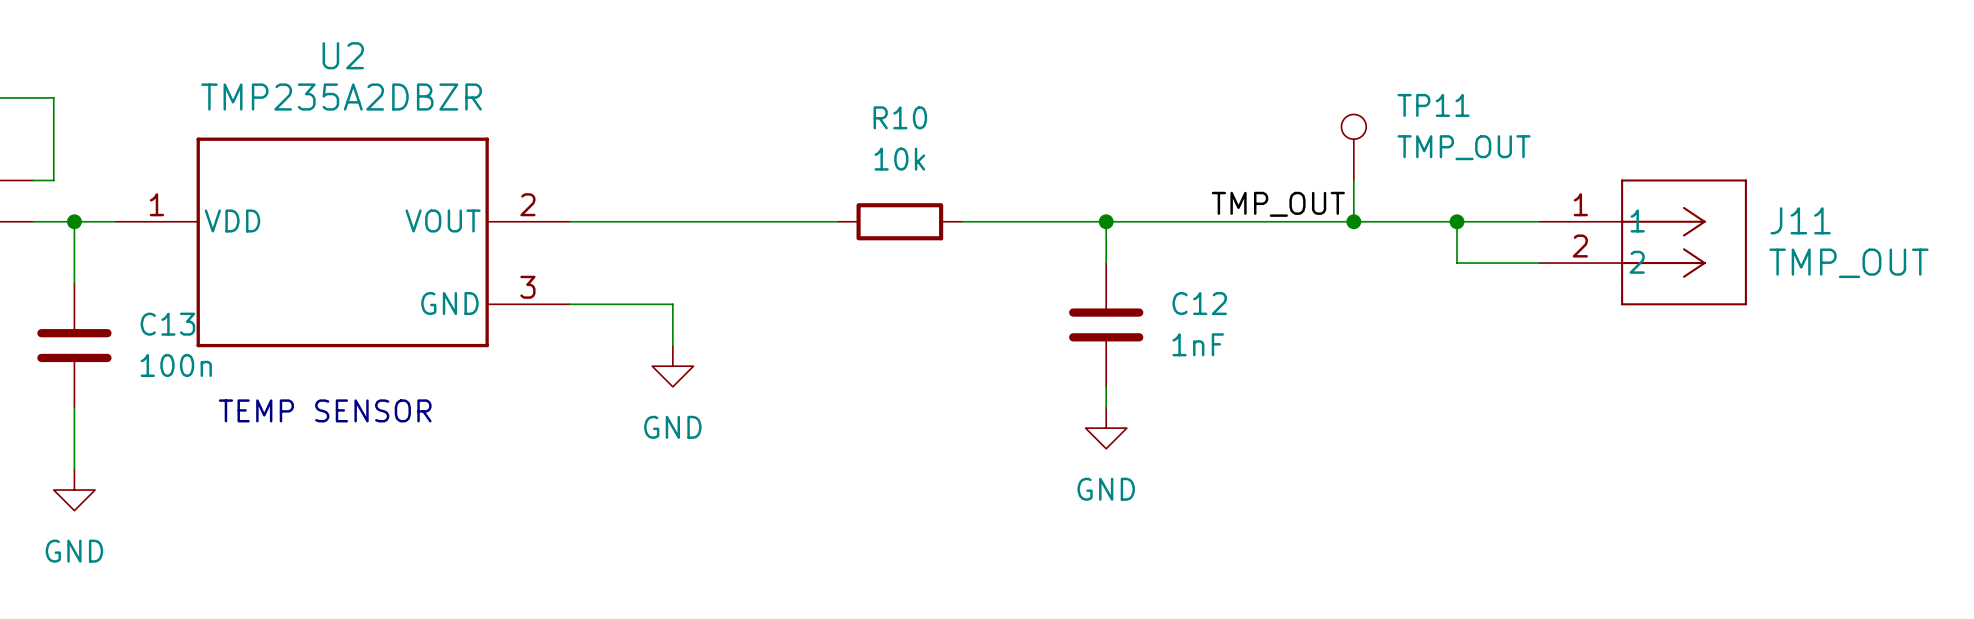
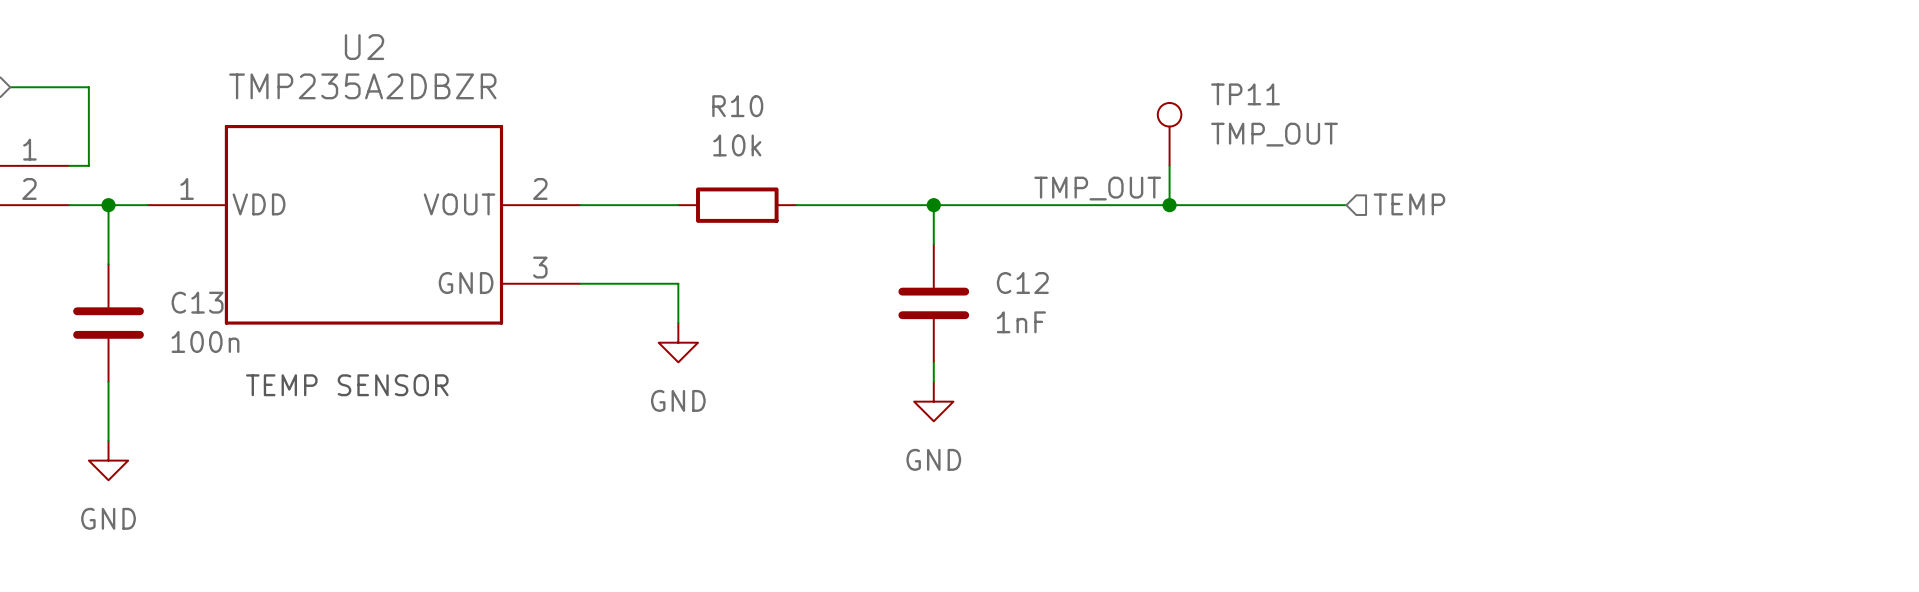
TP11 position: (1353, 147) -> (1169, 134)
wire: (1353, 180) (1353, 221) -> (1169, 165) (1169, 205)
label position: TMP_OUT (1278, 204) -> TMP_OUT (1097, 188)
hierarchical label: none -> TEMP (1409, 204)
wire: (672, 221) (796, 221) -> (835, 205) (953, 205)
R10 position: (899, 221) -> (737, 205)
junction: none -> (933, 205)
wire: (1106, 221) (1106, 263) -> (933, 205) (933, 244)
junction: (1106, 221) -> none
junction: none -> (1169, 205)
junction: (1353, 221) -> none
wire: (1374, 221) (1539, 221) -> none
wire: (1457, 221) (1457, 263) (1539, 263) -> none
junction: (1457, 221) -> none
J11: TMP_OUT (1643, 242) -> none
C12 position: (1106, 324) -> (933, 303)
wire: (1106, 386) (1106, 407) -> (933, 362) (933, 382)
power symbol position: GND (1106, 428) -> GND (933, 401)

